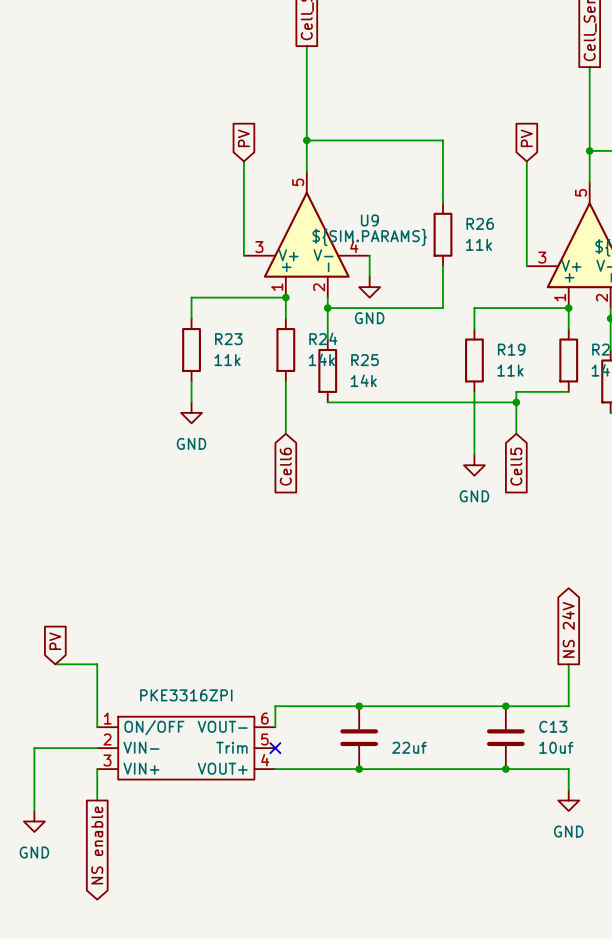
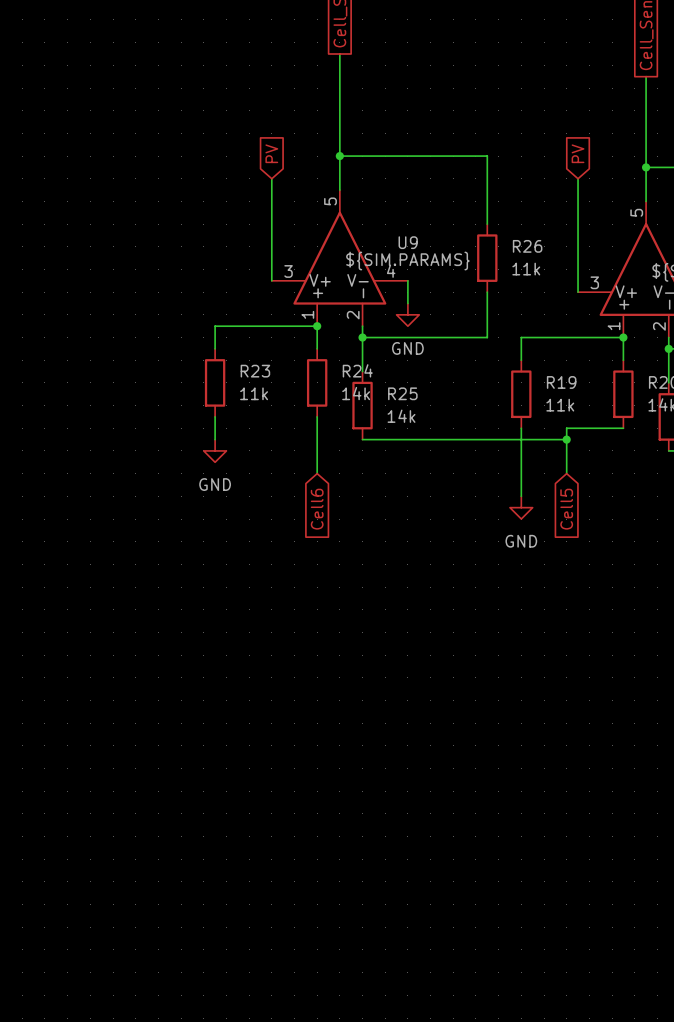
global label: NS 24V (568, 629) -> none
global label: PV (55, 641) -> none
wire: (55, 664) (97, 664) (97, 727) -> none
wire: (568, 664) (568, 706) (275, 706) (275, 727) -> none
junction: (359, 706) -> none
junction: (505, 706) -> none
part: 22uf (359, 737) -> none
C13: 10uf (505, 737) -> none
wire: (97, 748) (34, 748) (34, 811) -> none
part: PKE3316ZPI (186, 748) -> none
no-connect mark: (275, 748) -> none
wire: (97, 769) (97, 800) -> none
wire: (275, 769) (568, 769) (568, 790) -> none
junction: (359, 769) -> none
junction: (505, 769) -> none
power symbol: GND (568, 800) -> none
power symbol: GND (34, 821) -> none
global label: NS enable (97, 845) -> none

